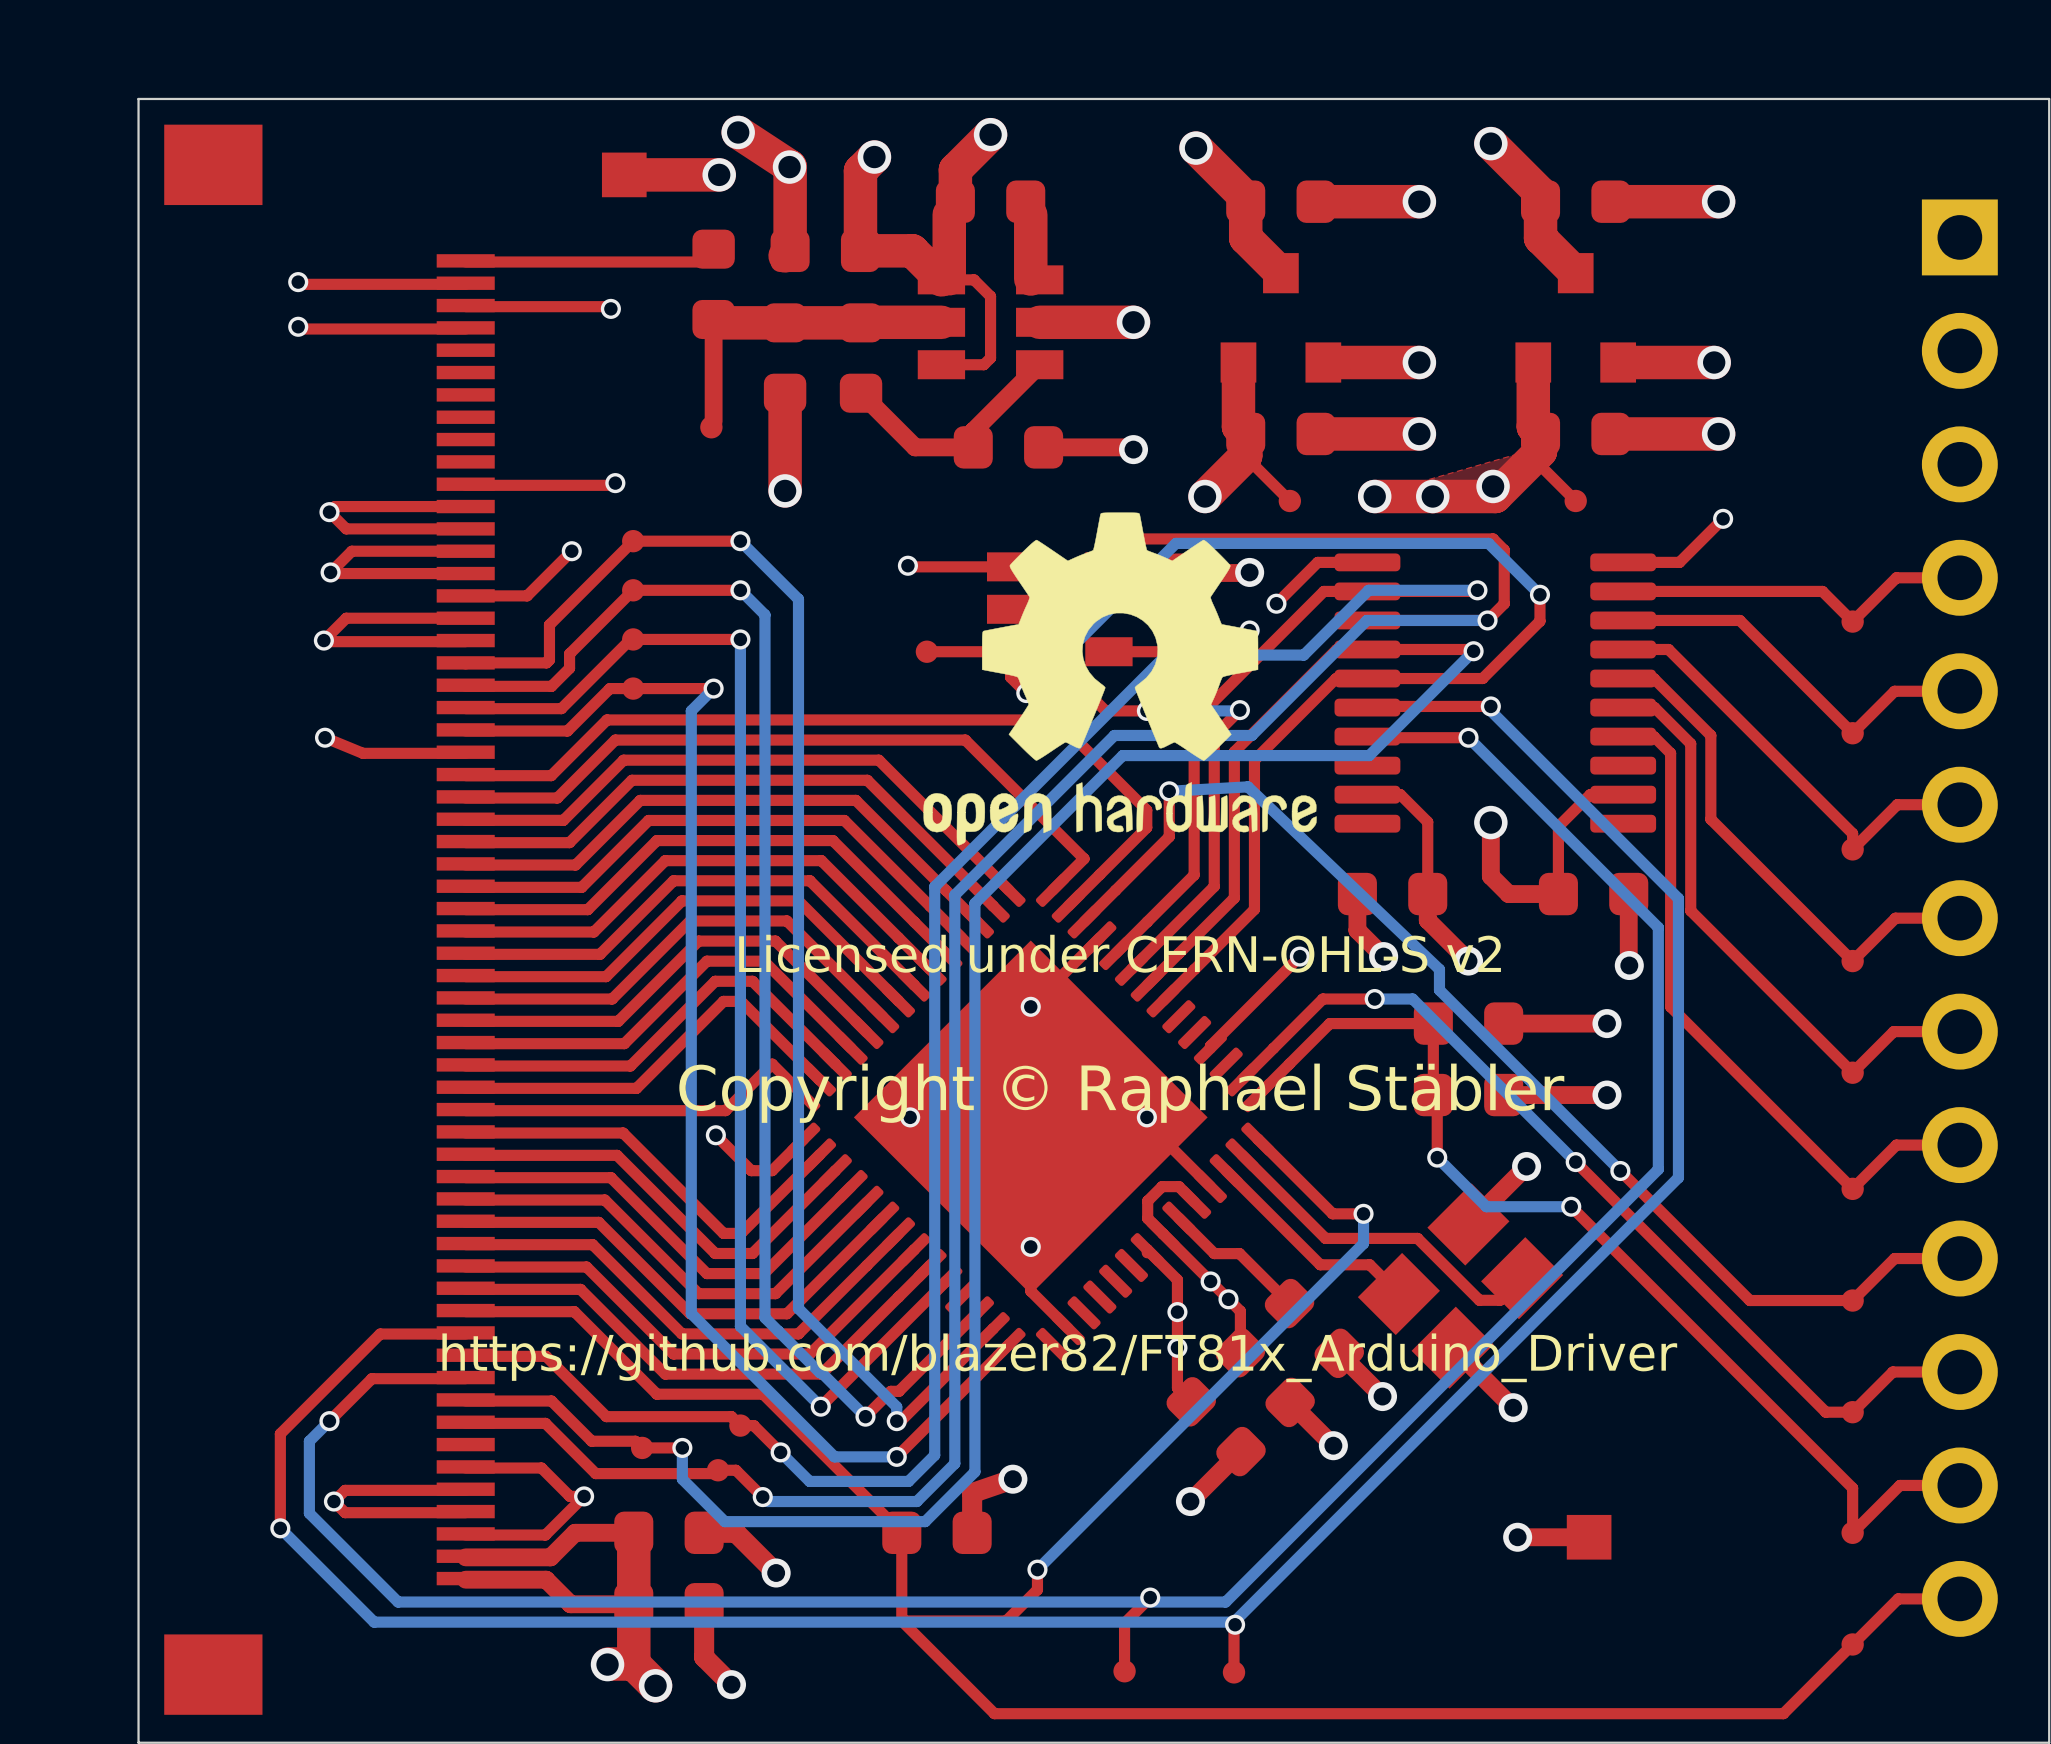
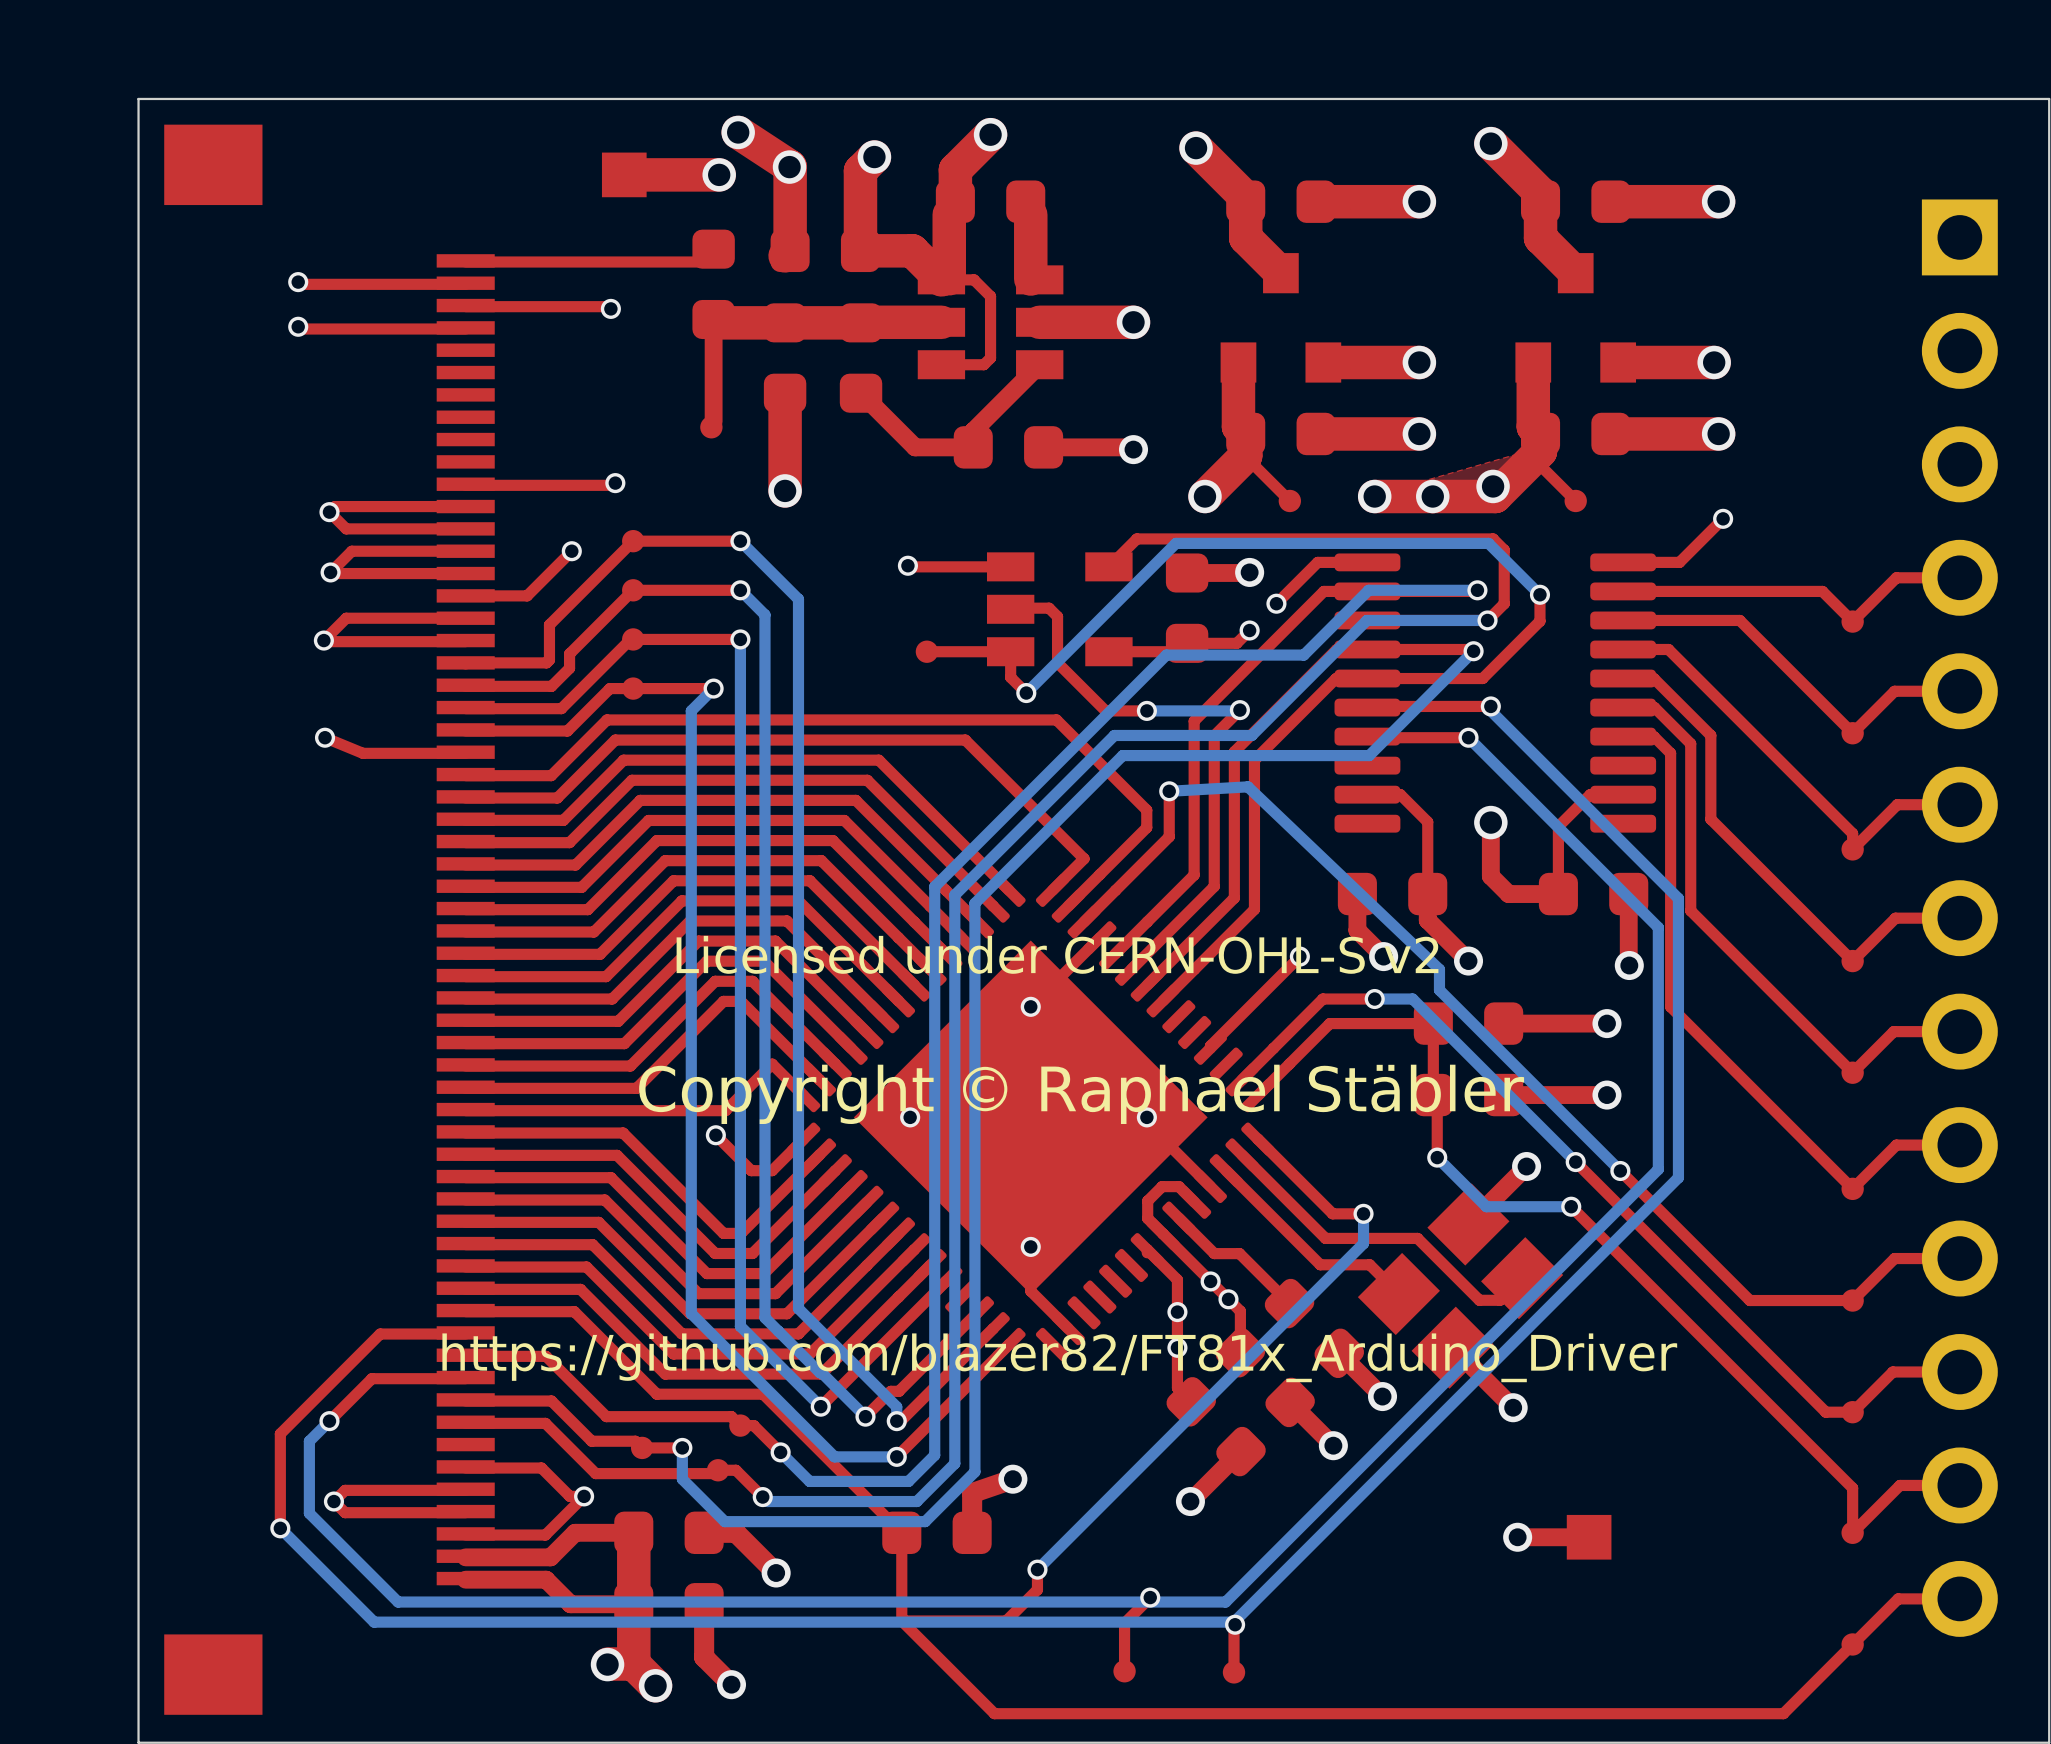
drawing: [923, 512, 1317, 846] -> none
text position: Licensed under CERN-OHL-S v2 (1120, 953) -> Licensed under CERN-OHL-S v2 (1057, 954)
text position: Copyright © Raphael Stäbler (1121, 1093) -> Copyright © Raphael Stäbler (1081, 1094)

